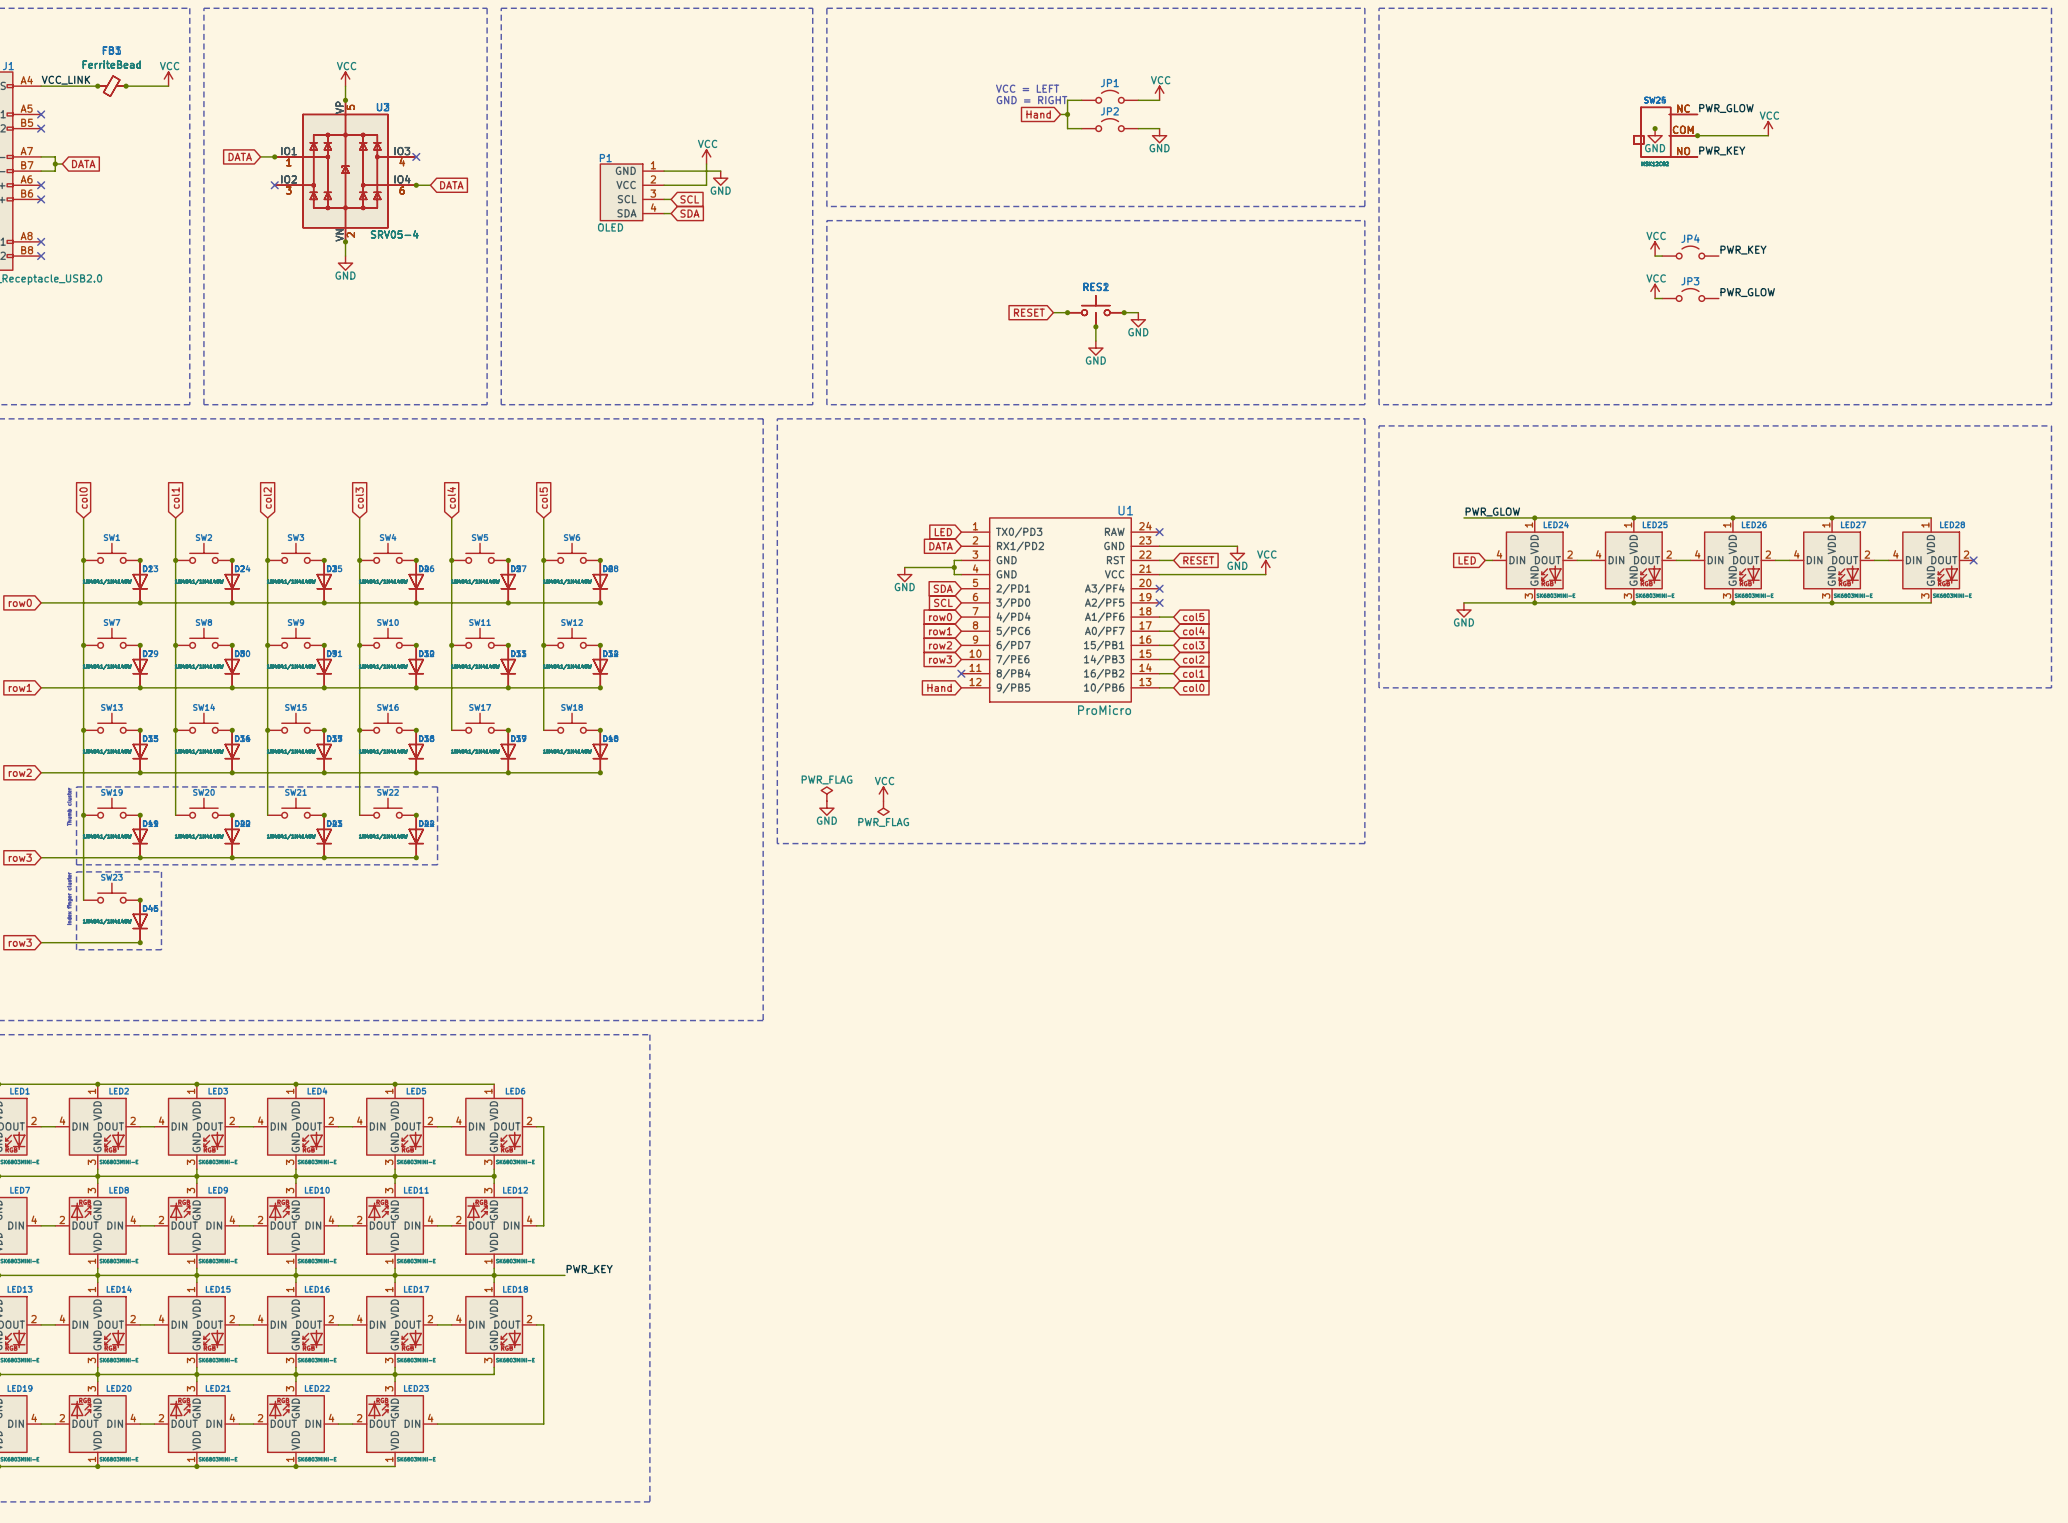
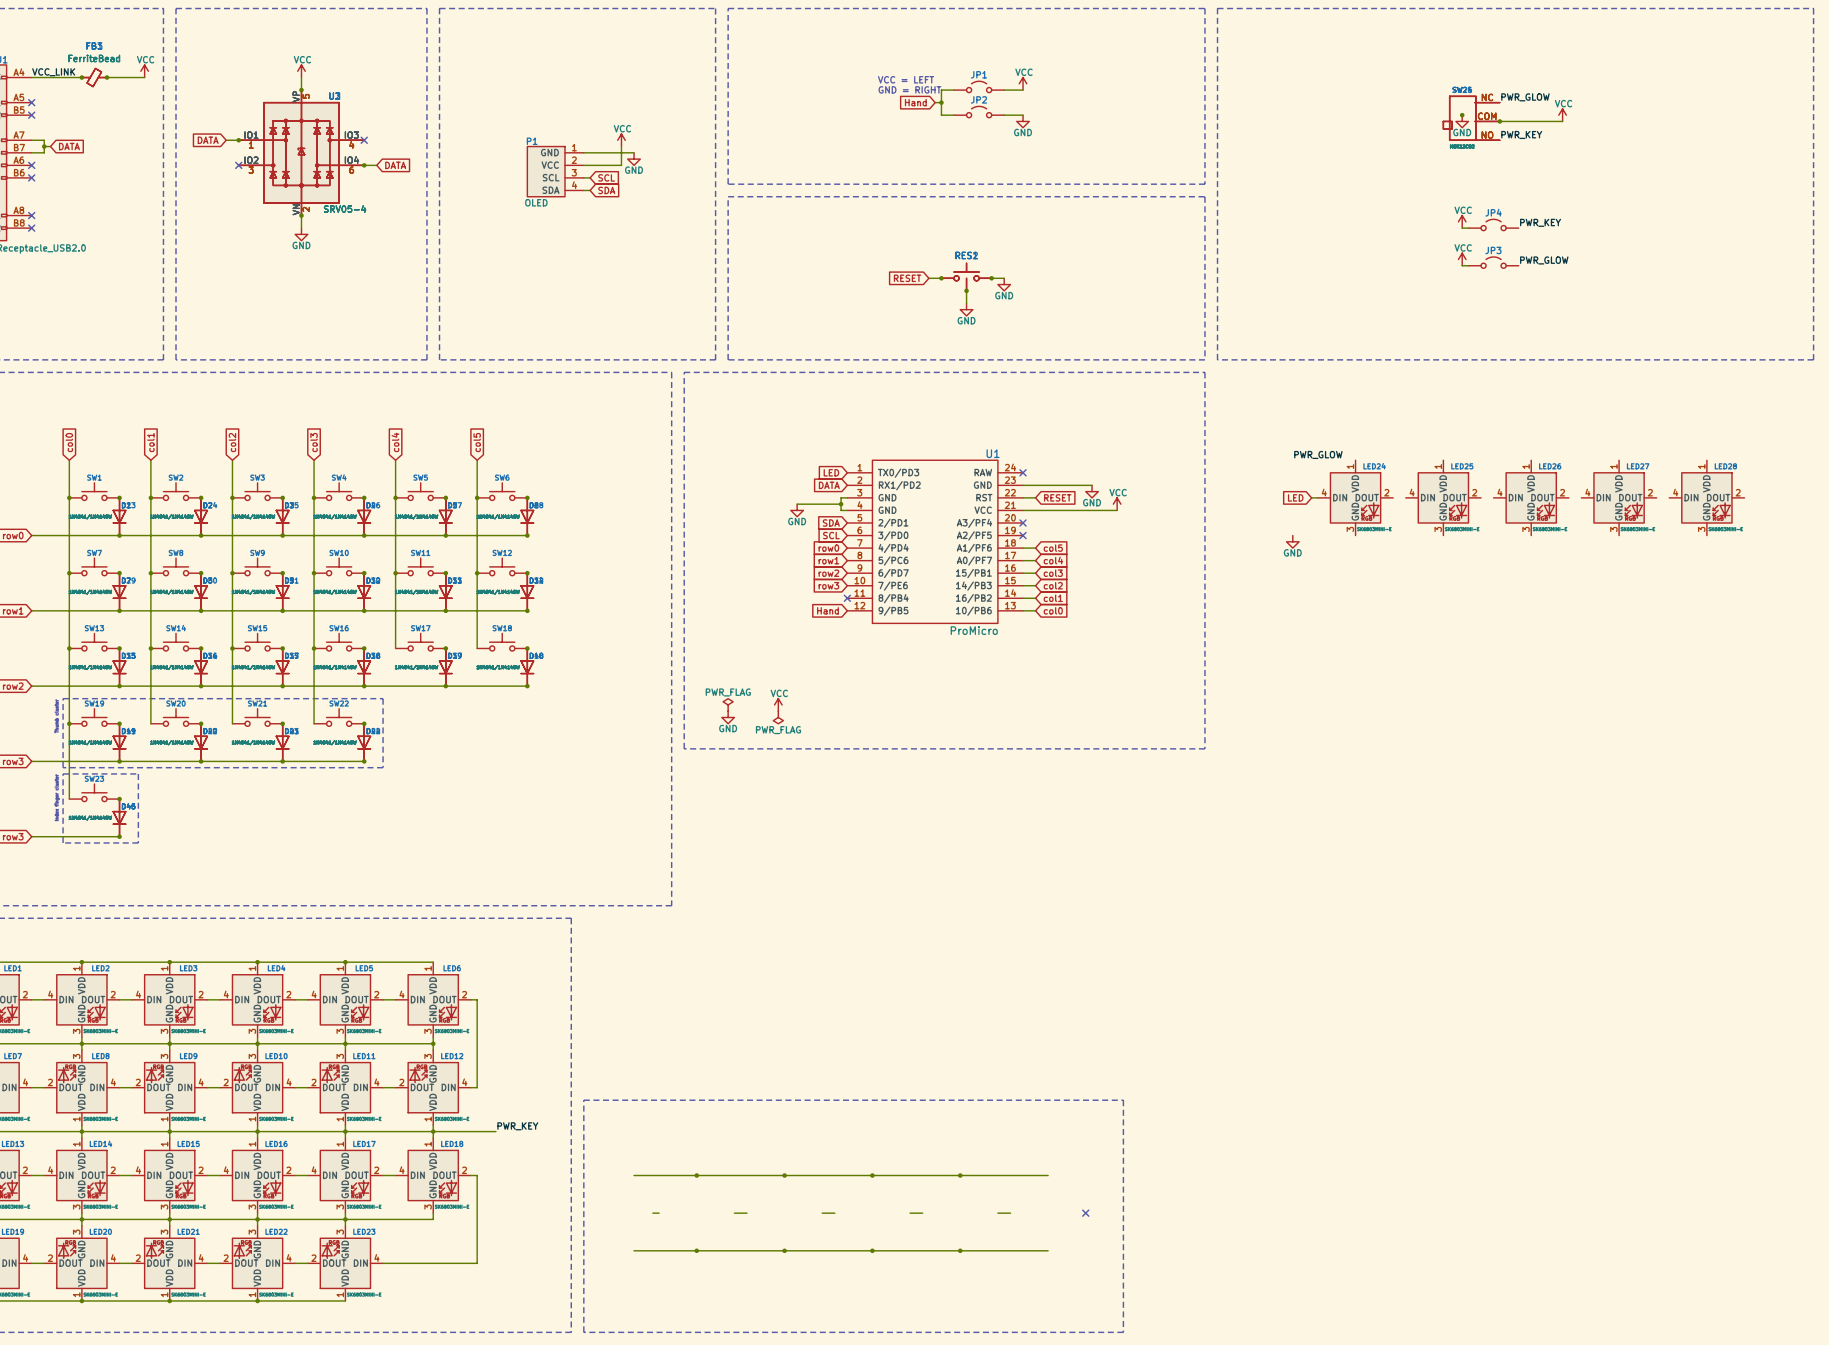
line: (1379, 425) (2051, 425) (2051, 687) (1379, 687) (1379, 425) -> none
wire: (1463, 517) (1931, 517) -> none
junction: (1534, 517) -> none
junction: (1633, 517) -> none
junction: (1732, 517) -> none
junction: (1832, 517) -> none
wire: (1577, 560) (1591, 560) -> none
wire: (1676, 560) (1690, 560) -> none
wire: (1775, 560) (1789, 560) -> none
wire: (1874, 560) (1888, 560) -> none
no-connect mark: (1973, 560) -> none
wire: (1463, 602) (1931, 602) -> none
junction: (1534, 602) -> none
junction: (1633, 602) -> none
junction: (1732, 602) -> none
junction: (1832, 602) -> none
line: none -> (583, 1100) (1123, 1100) (1123, 1332) (583, 1332) (583, 1100)
wire: none -> (634, 1175) (1048, 1175)
junction: none -> (696, 1175)
junction: none -> (784, 1175)
junction: none -> (872, 1175)
junction: none -> (960, 1175)
wire: none -> (652, 1213) (659, 1213)
wire: none -> (734, 1213) (746, 1213)
wire: none -> (822, 1213) (834, 1213)
wire: none -> (910, 1213) (922, 1213)
wire: none -> (997, 1213) (1010, 1213)
no-connect mark: none -> (1085, 1213)
wire: none -> (634, 1250) (1048, 1250)
junction: none -> (696, 1250)
junction: none -> (784, 1250)
junction: none -> (872, 1250)
junction: none -> (960, 1250)

